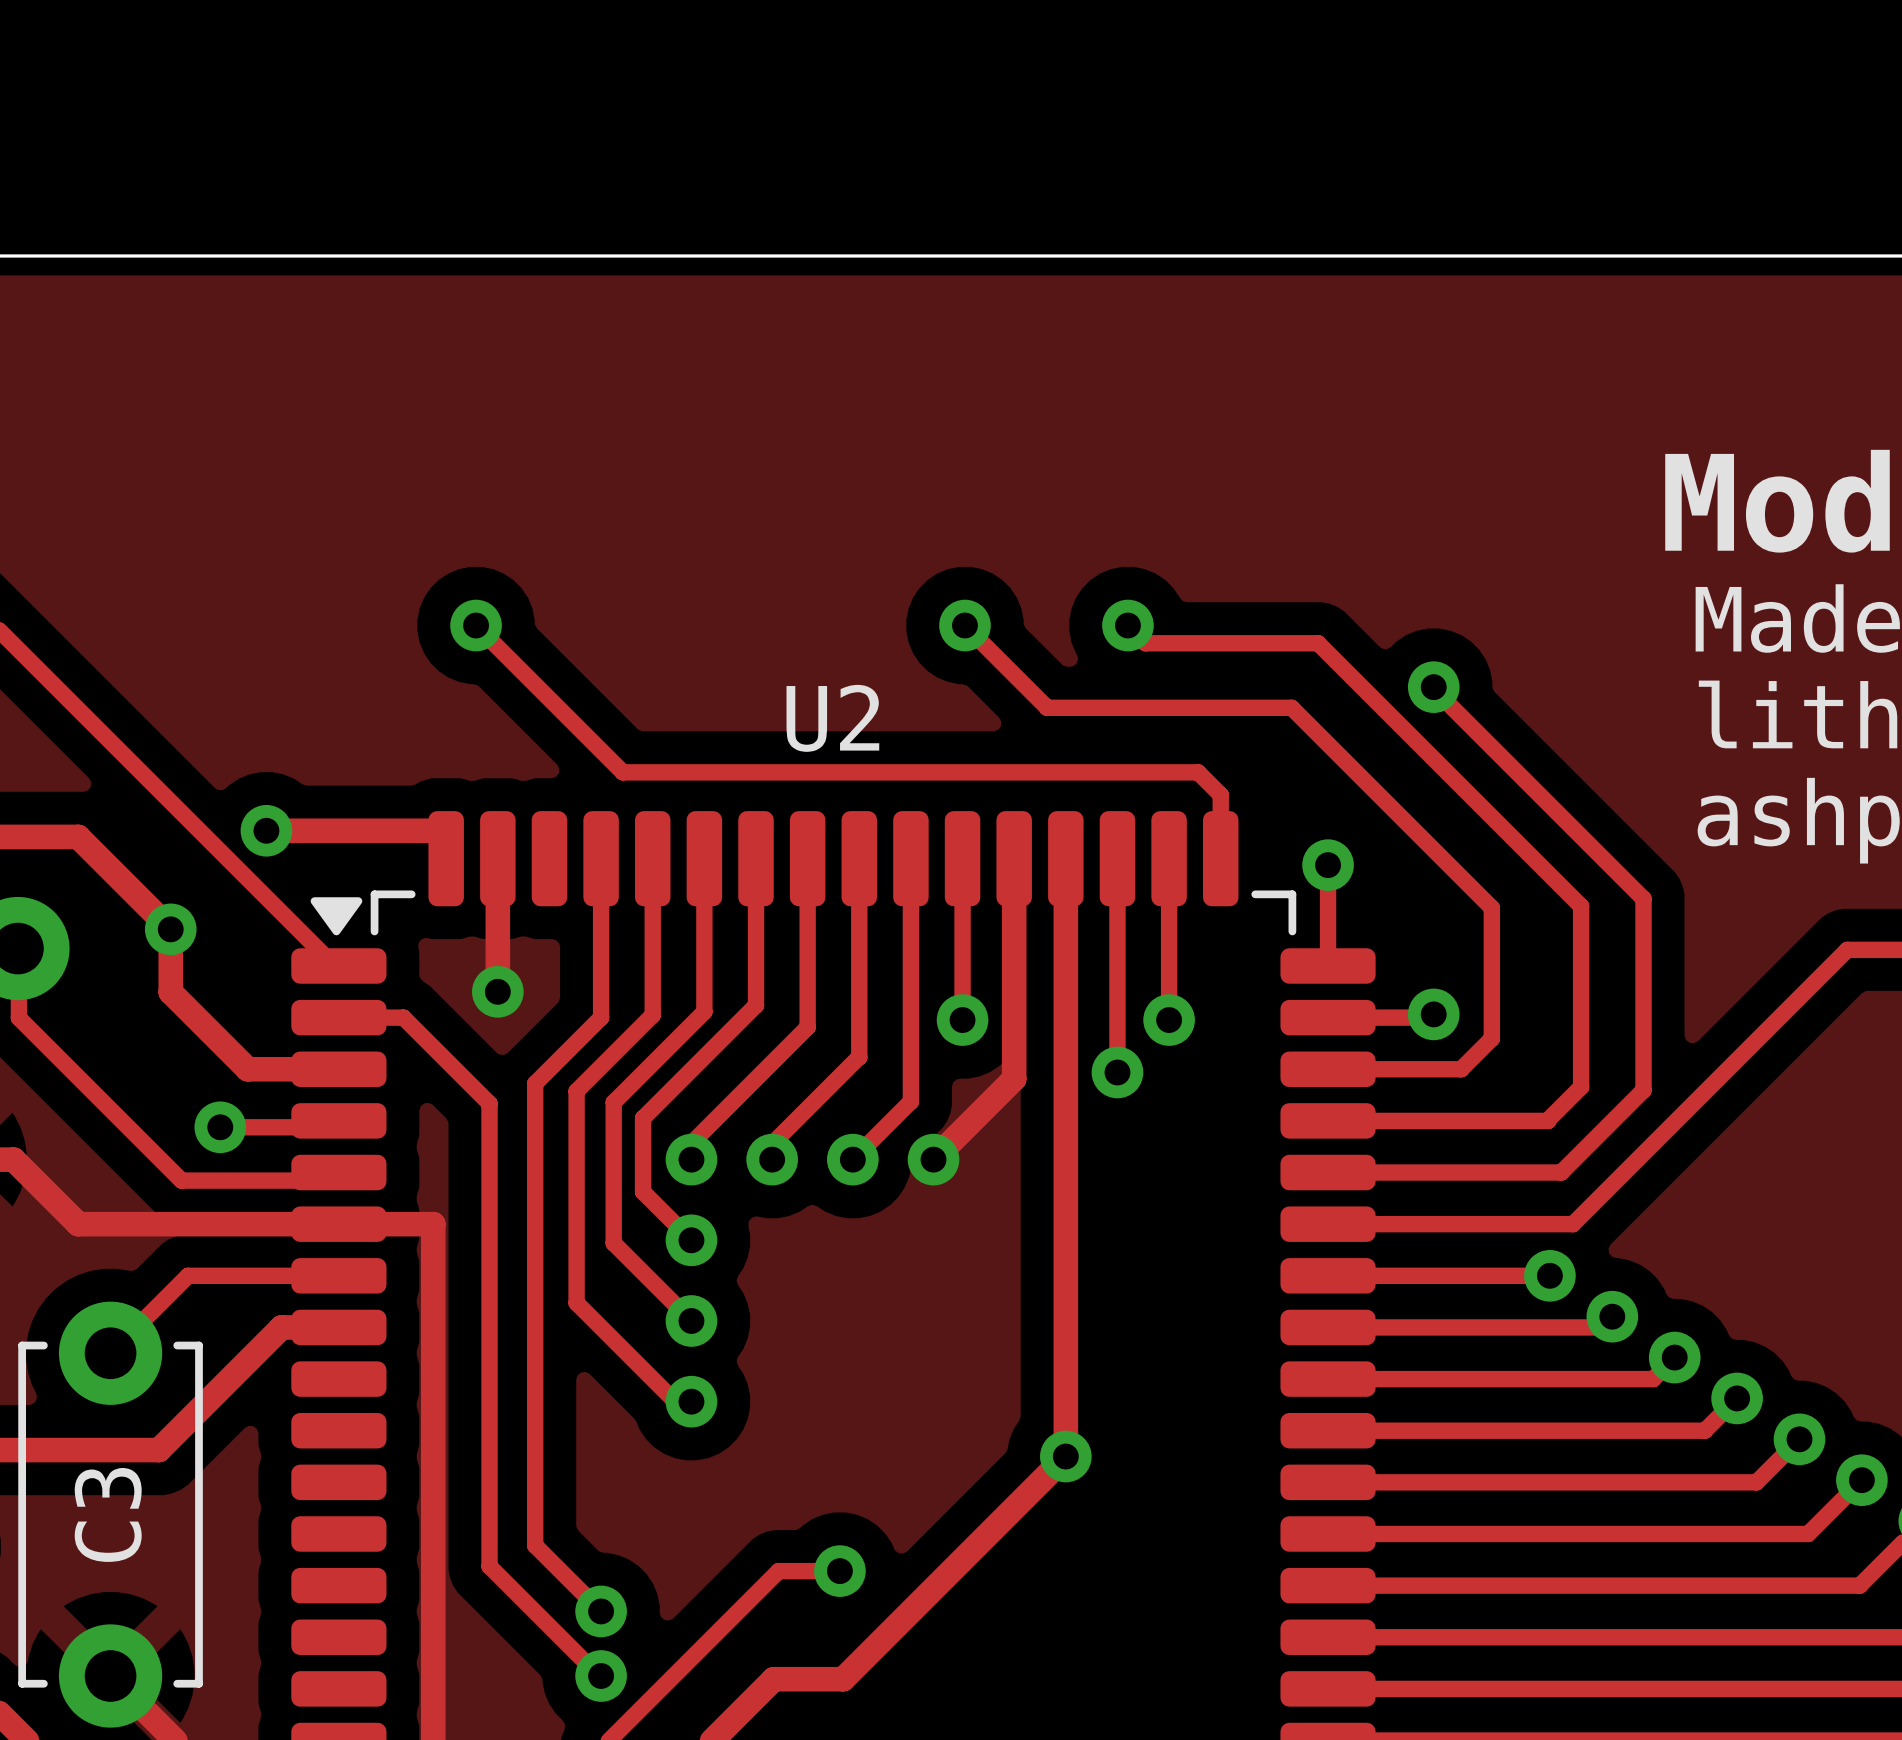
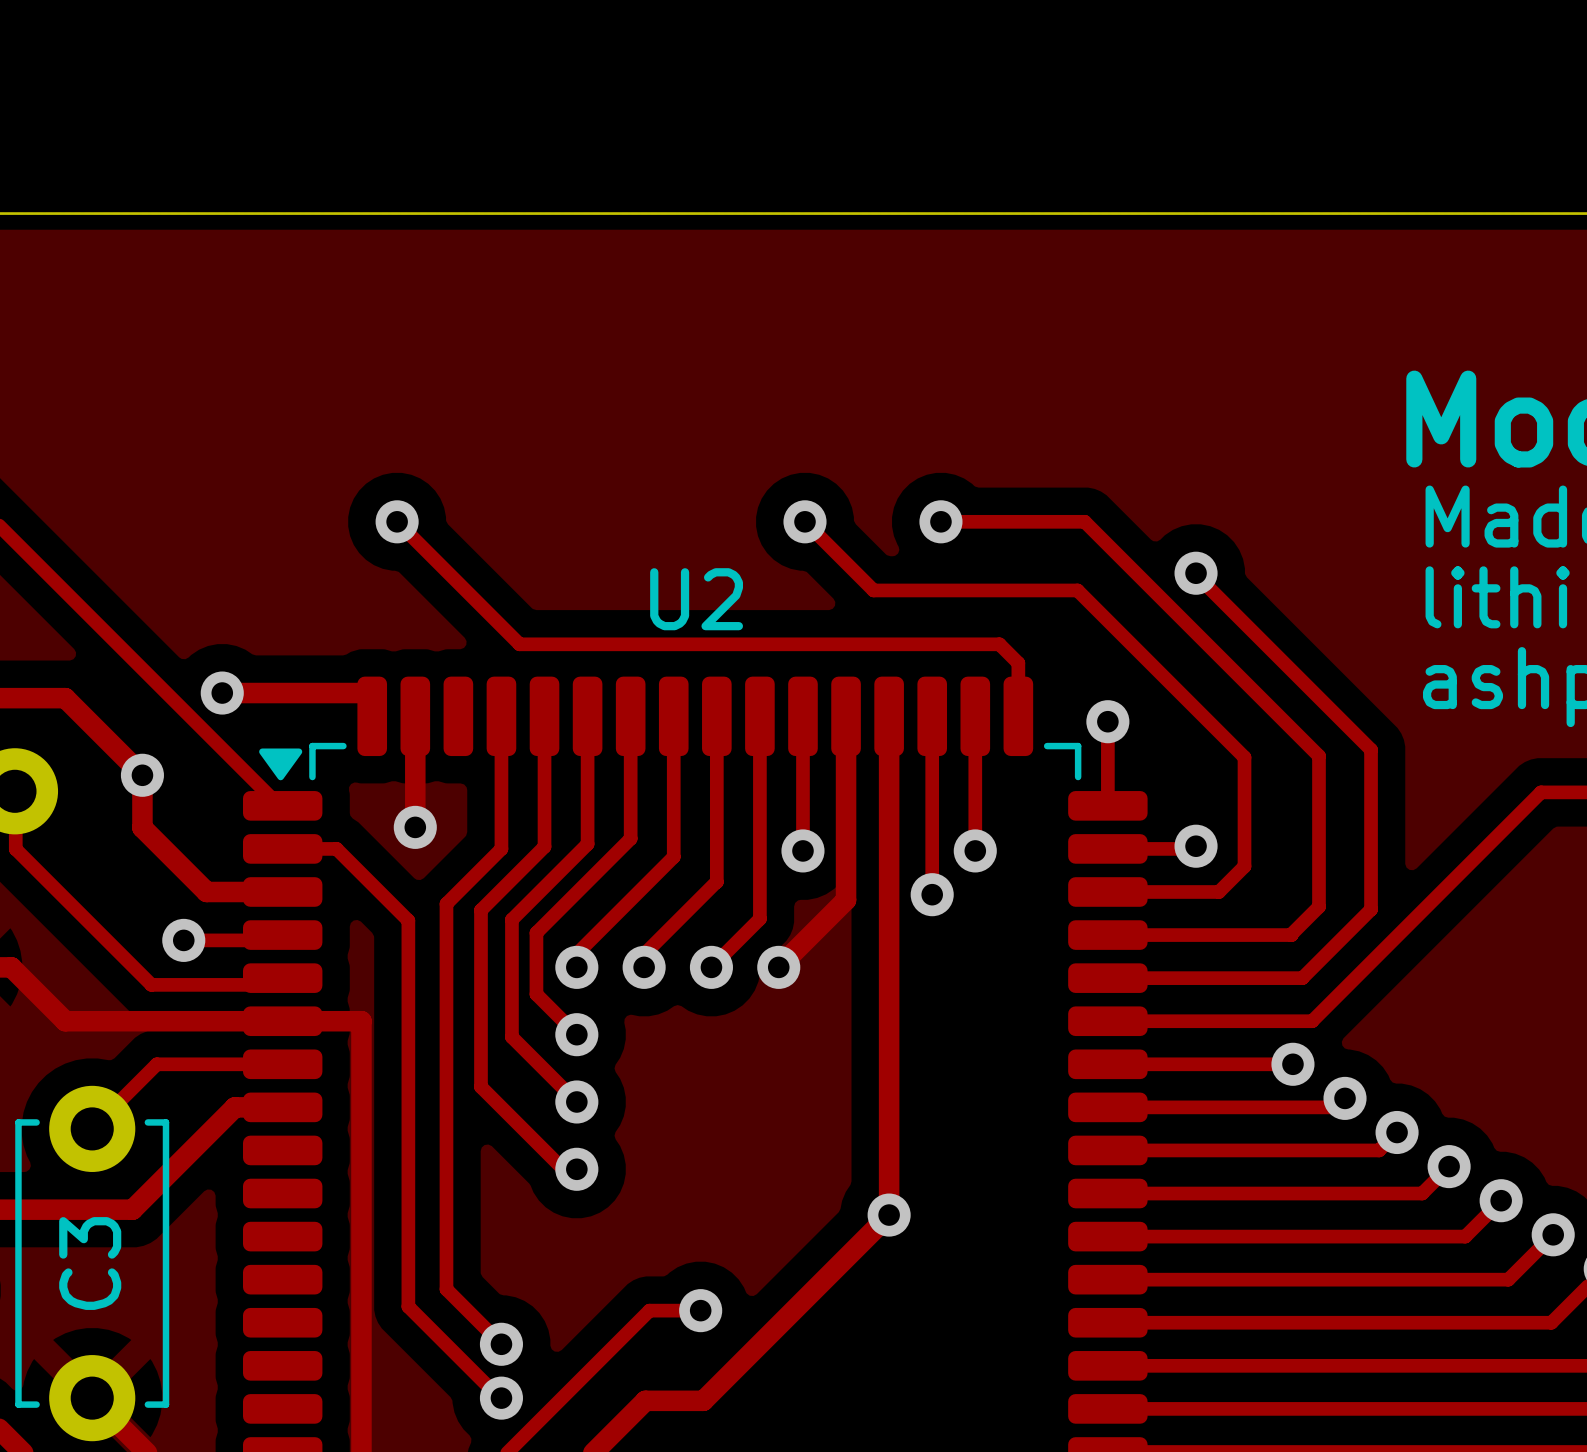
track: (1127, 625) (1145, 643) (1318, 643) -> (940, 521) (1084, 521) (1099, 536)

